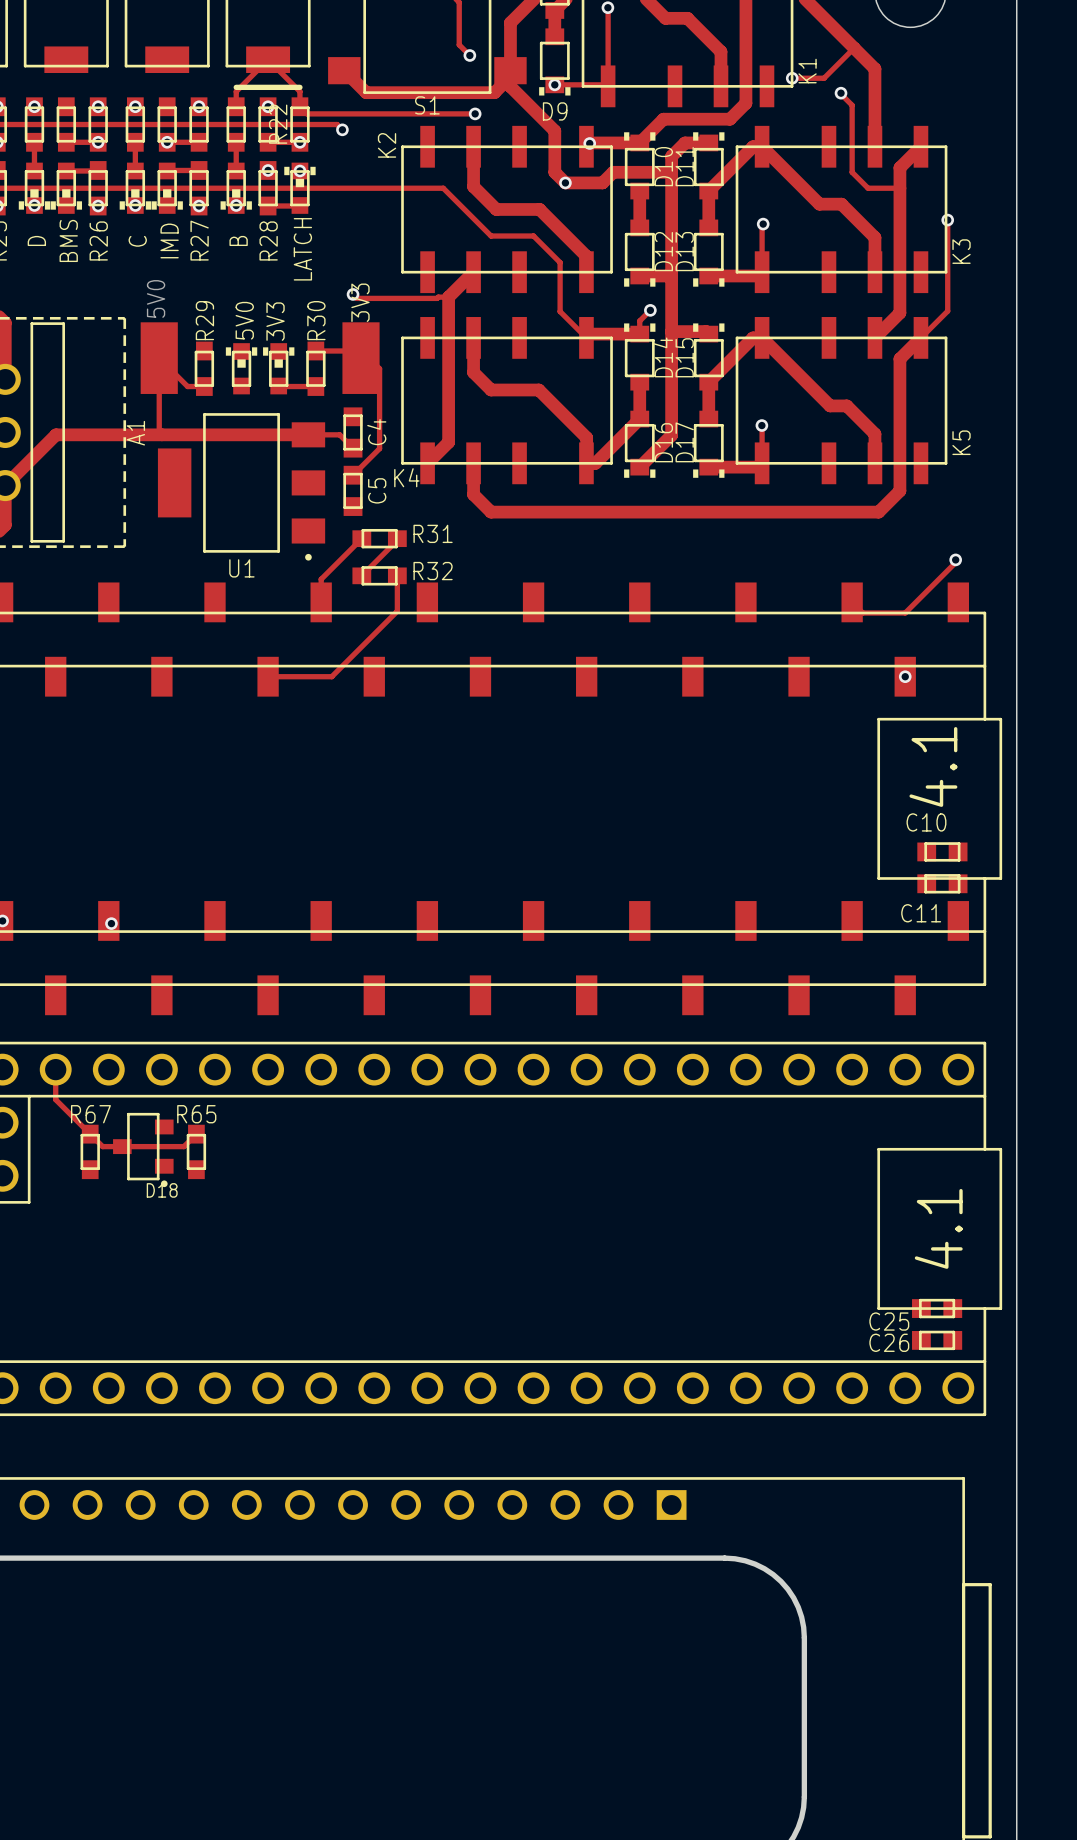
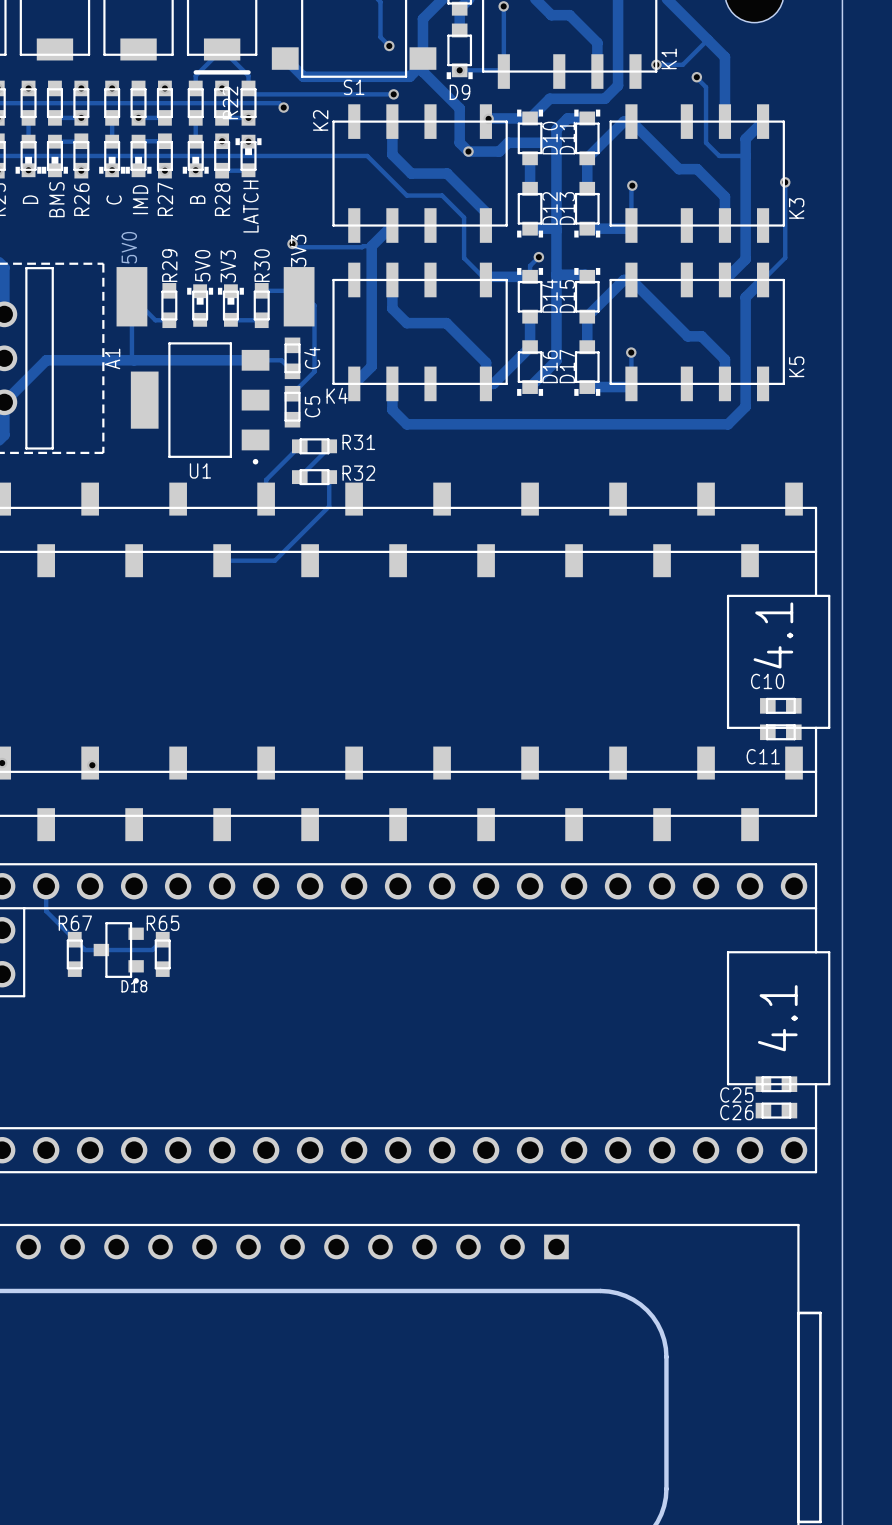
track: (955, 559) (955, 562) (905, 613) (862, 613) (852, 602) -> none
via: (955, 559) -> none
via: (905, 676) -> none

